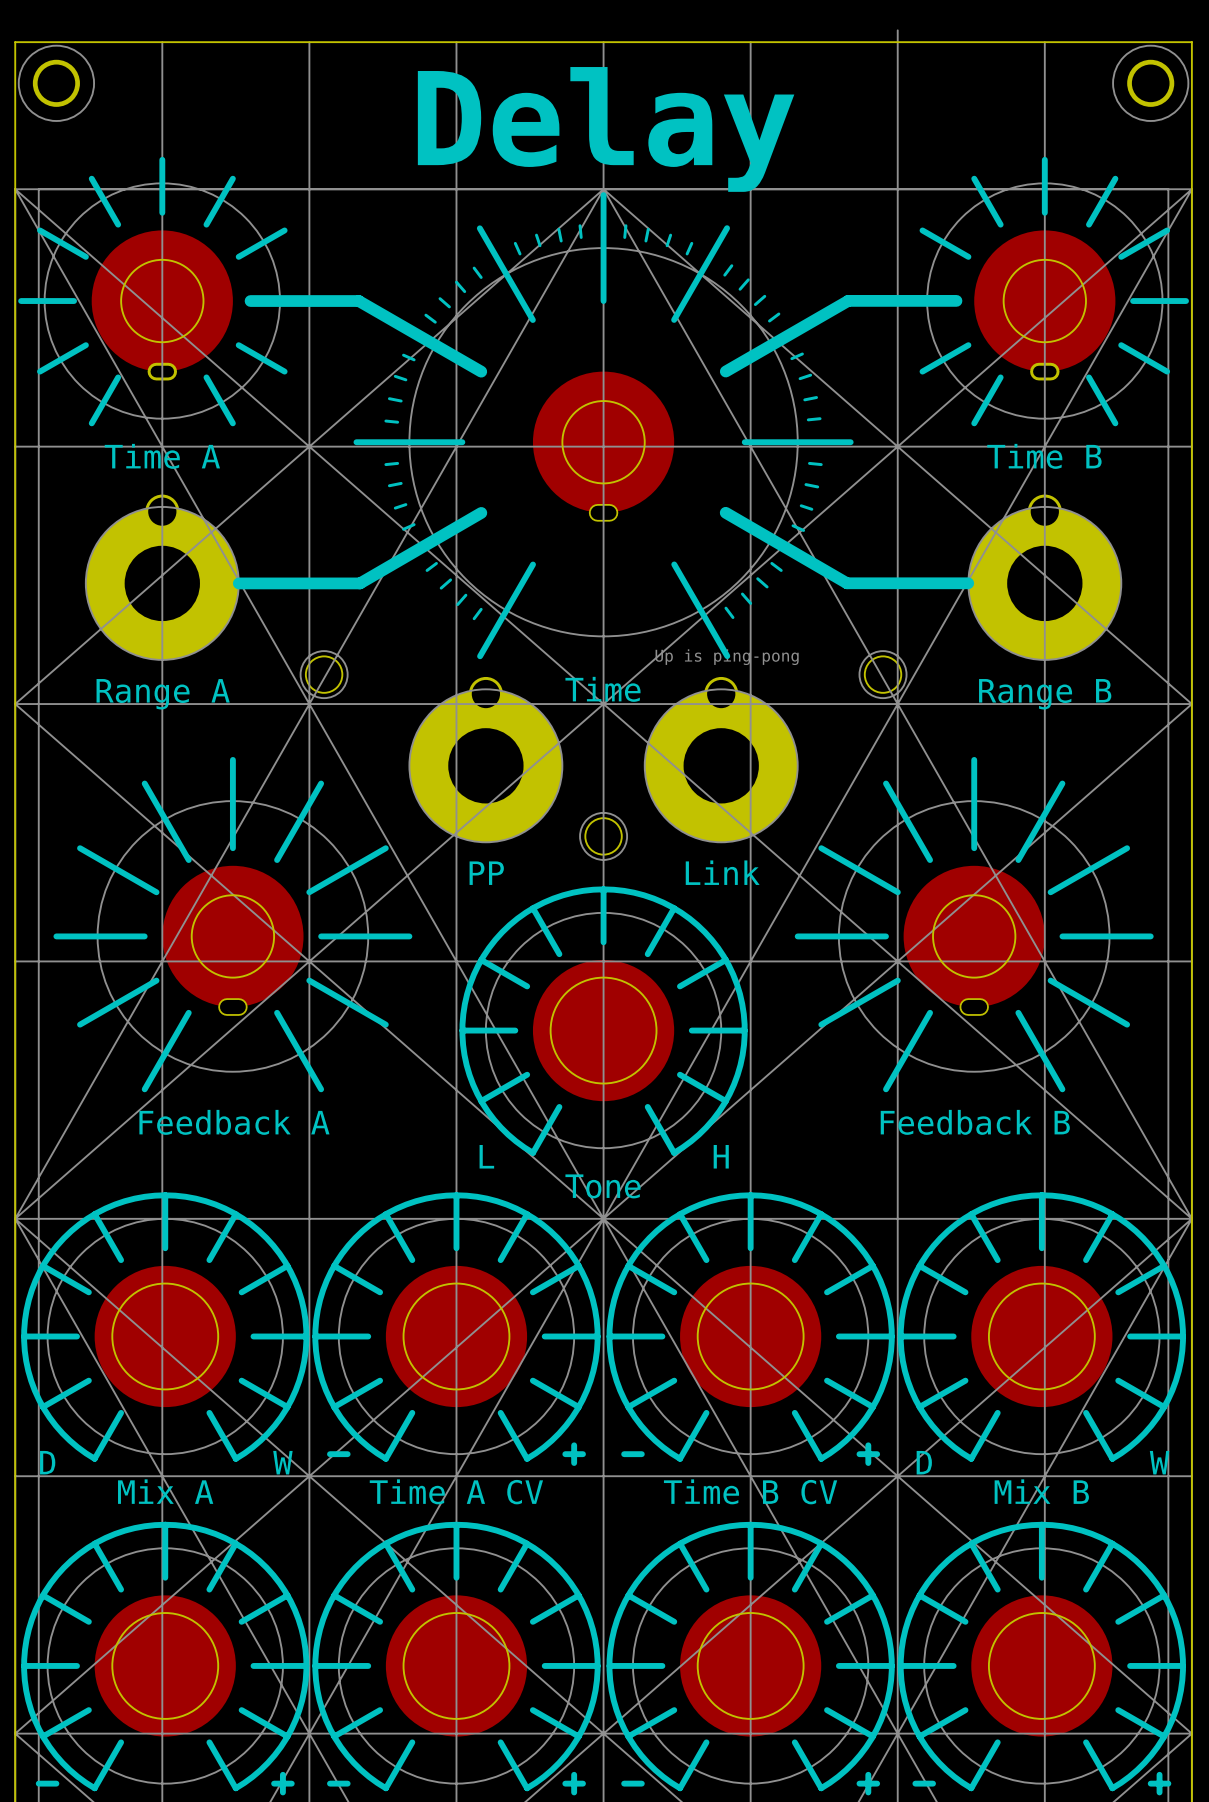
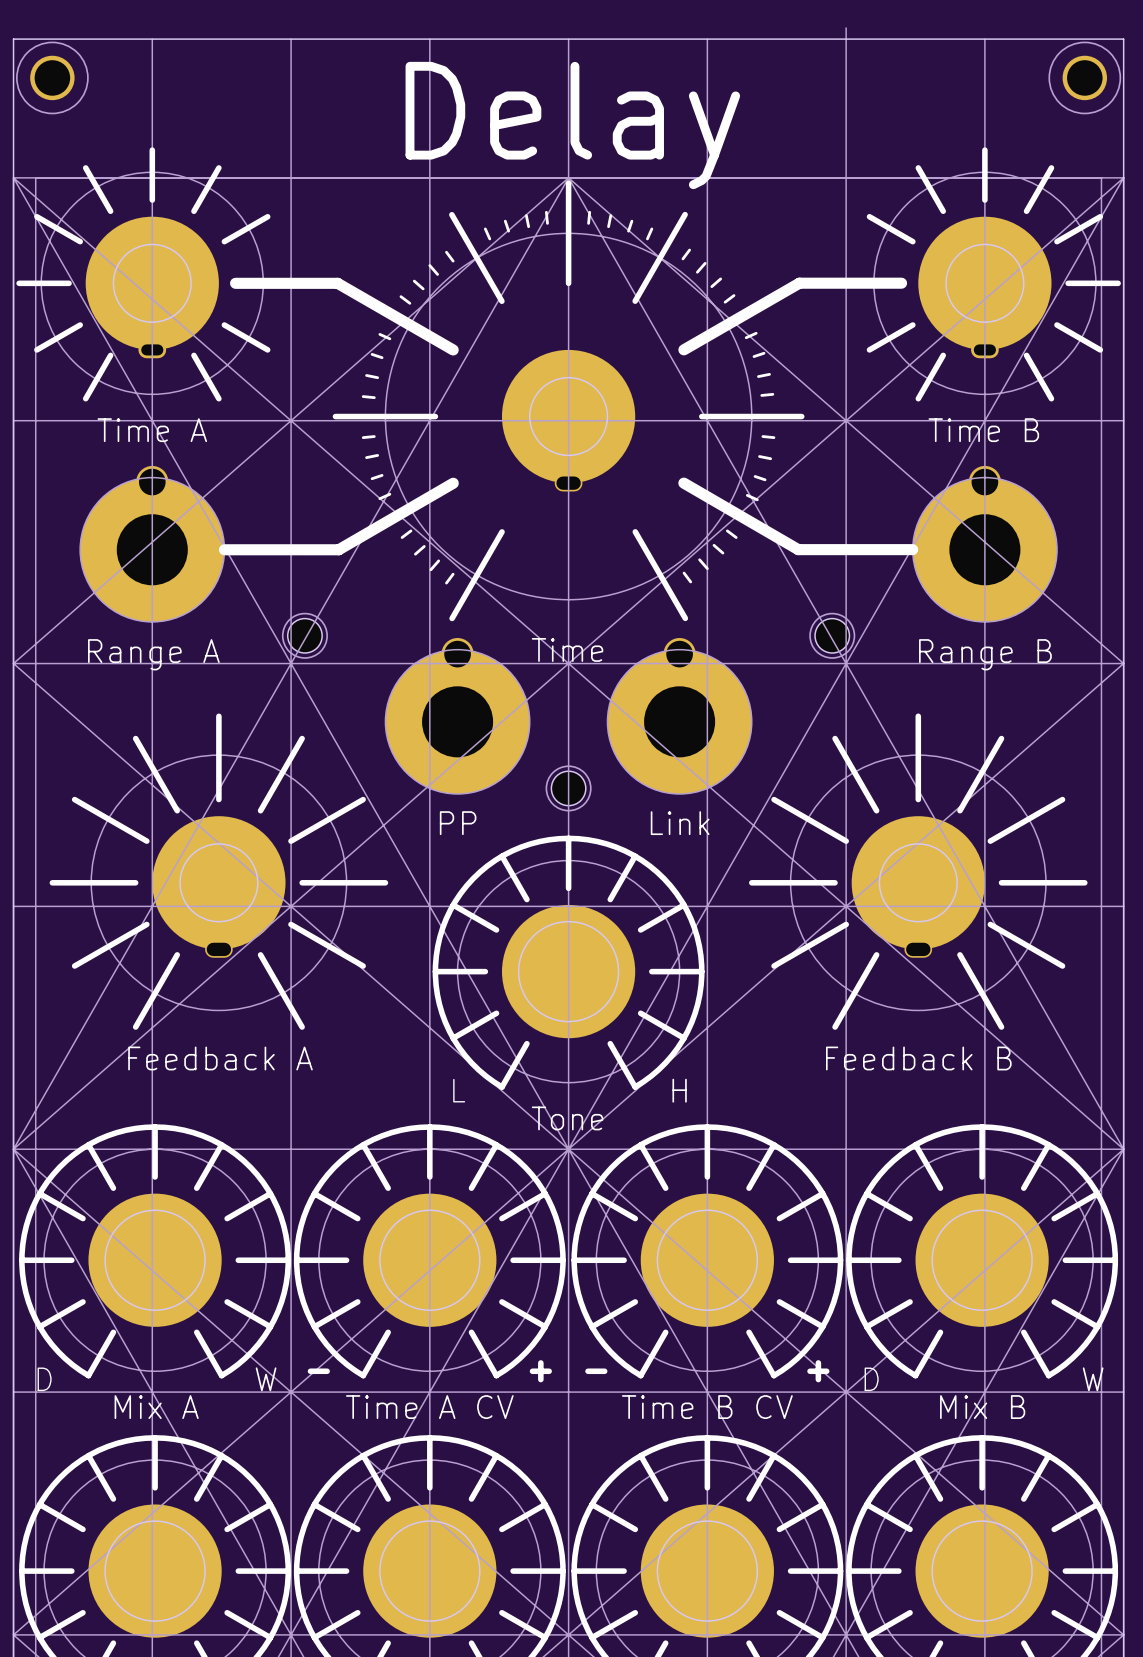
text: Up is ping-pong (727, 657) -> none

